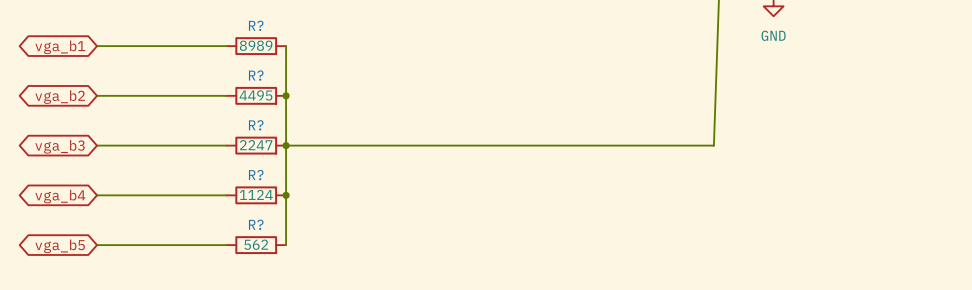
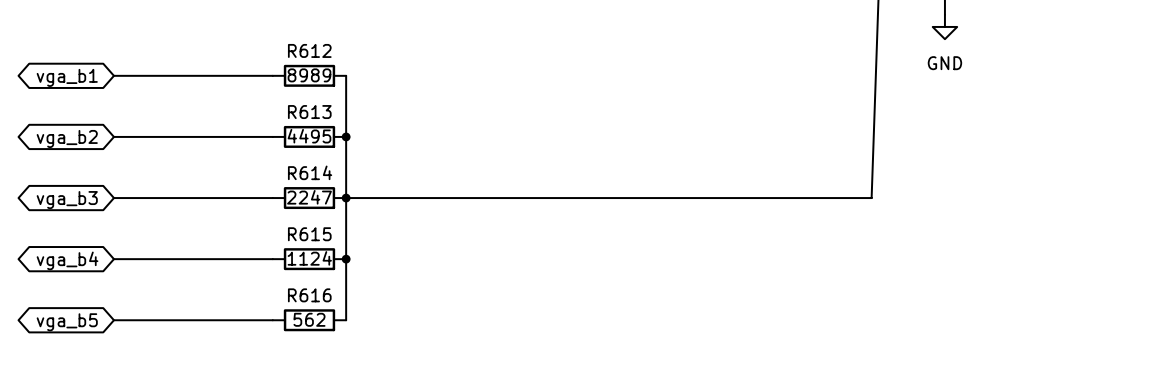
R? name: R? (256, 25) -> R612 (309, 50)
R? name: R? (256, 75) -> R613 (309, 112)
R? name: R? (256, 125) -> R614 (310, 172)
R? name: R? (256, 175) -> R615 (309, 234)
R? name: R? (256, 224) -> R616 (309, 295)

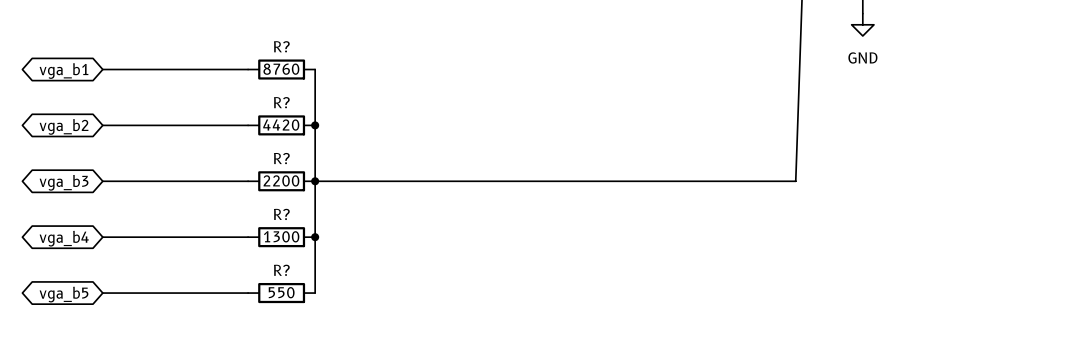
R612 name: R612 (309, 50) -> R? (281, 46)
R612 value: 8989 (309, 75) -> 8760 (281, 69)
R613 name: R613 (309, 112) -> R? (281, 102)
R613 value: 4495 (309, 136) -> 4420 (281, 125)
R614 name: R614 (310, 172) -> R? (281, 158)
R614 value: 2247 (309, 197) -> 2200 (281, 180)
R615 name: R615 (309, 234) -> R? (281, 214)
R615 value: 1124 (309, 258) -> 1300 (281, 236)
R616 name: R616 (309, 295) -> R? (281, 270)
R616 value: 562 (309, 319) -> 550 (281, 292)

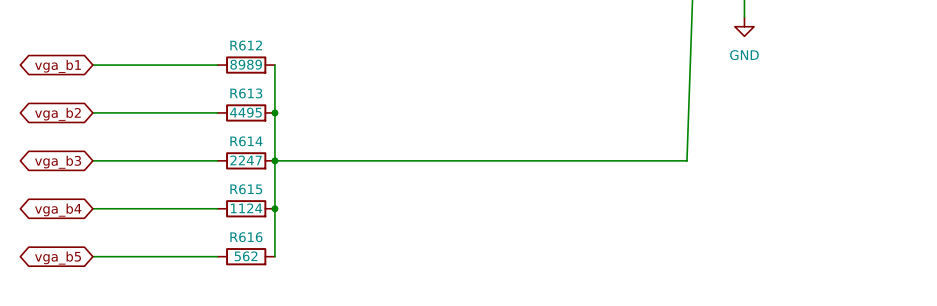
R? name: R? (281, 46) -> R612 (246, 45)
R? value: 8760 (281, 69) -> 8989 (246, 64)
R? name: R? (281, 102) -> R613 (246, 93)
R? value: 4420 (281, 125) -> 4495 (245, 112)
R? name: R? (281, 158) -> R614 (246, 141)
R? value: 2200 (281, 180) -> 2247 (246, 160)
R? name: R? (281, 214) -> R615 (246, 189)
R? value: 1300 (281, 236) -> 1124 (246, 208)
R? name: R? (281, 270) -> R616 (246, 237)
R? value: 550 (281, 292) -> 562 (246, 256)

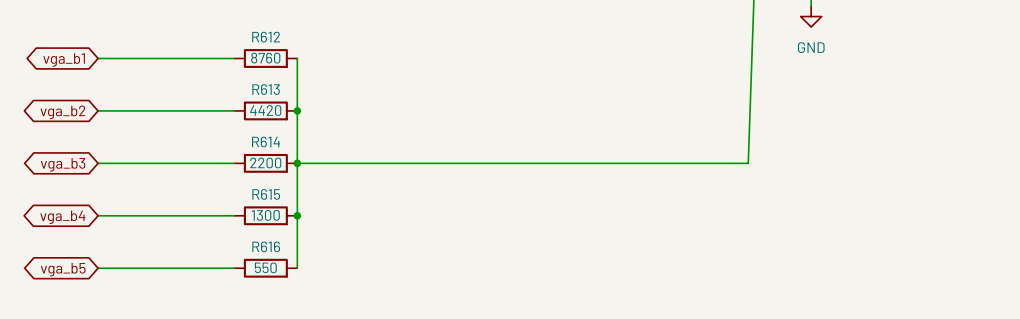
R612 value: 8989 (246, 64) -> 8760 (265, 58)
R613 value: 4495 (245, 112) -> 4420 (265, 110)
R614 value: 2247 (246, 160) -> 2200 (265, 162)
R615 value: 1124 (246, 208) -> 1300 (265, 215)
R616 value: 562 (246, 256) -> 550 (265, 267)

